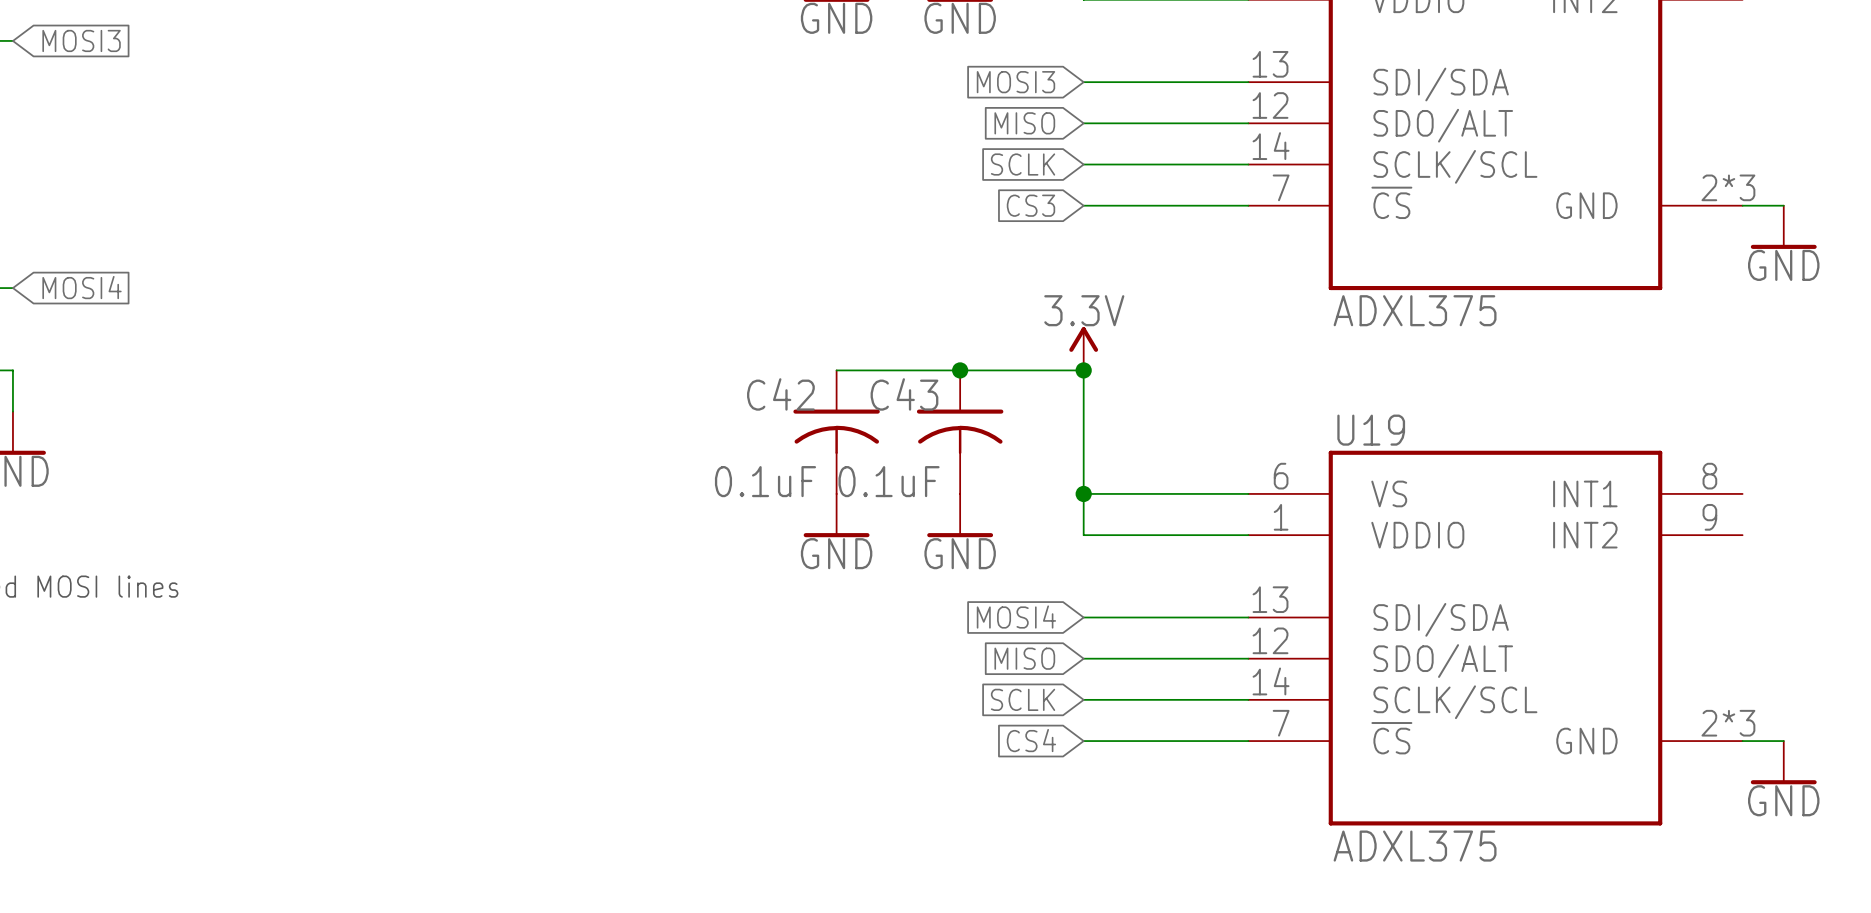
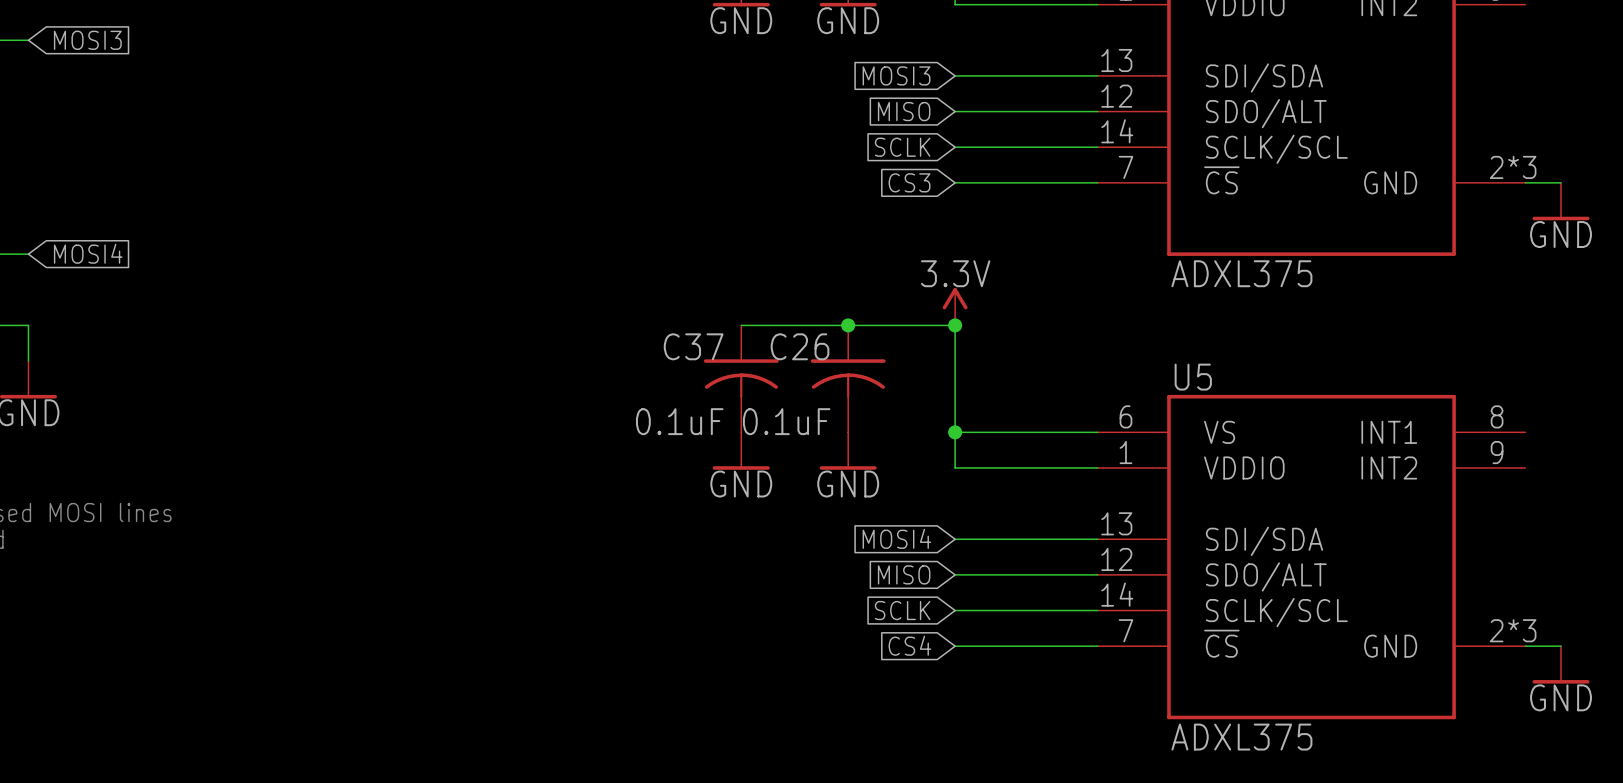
C42 name: C42 (780, 394) -> C37 (693, 346)
C43 name: C43 (904, 394) -> C26 (800, 346)
U19 name: U19 (1371, 430) -> U5 (1193, 377)

